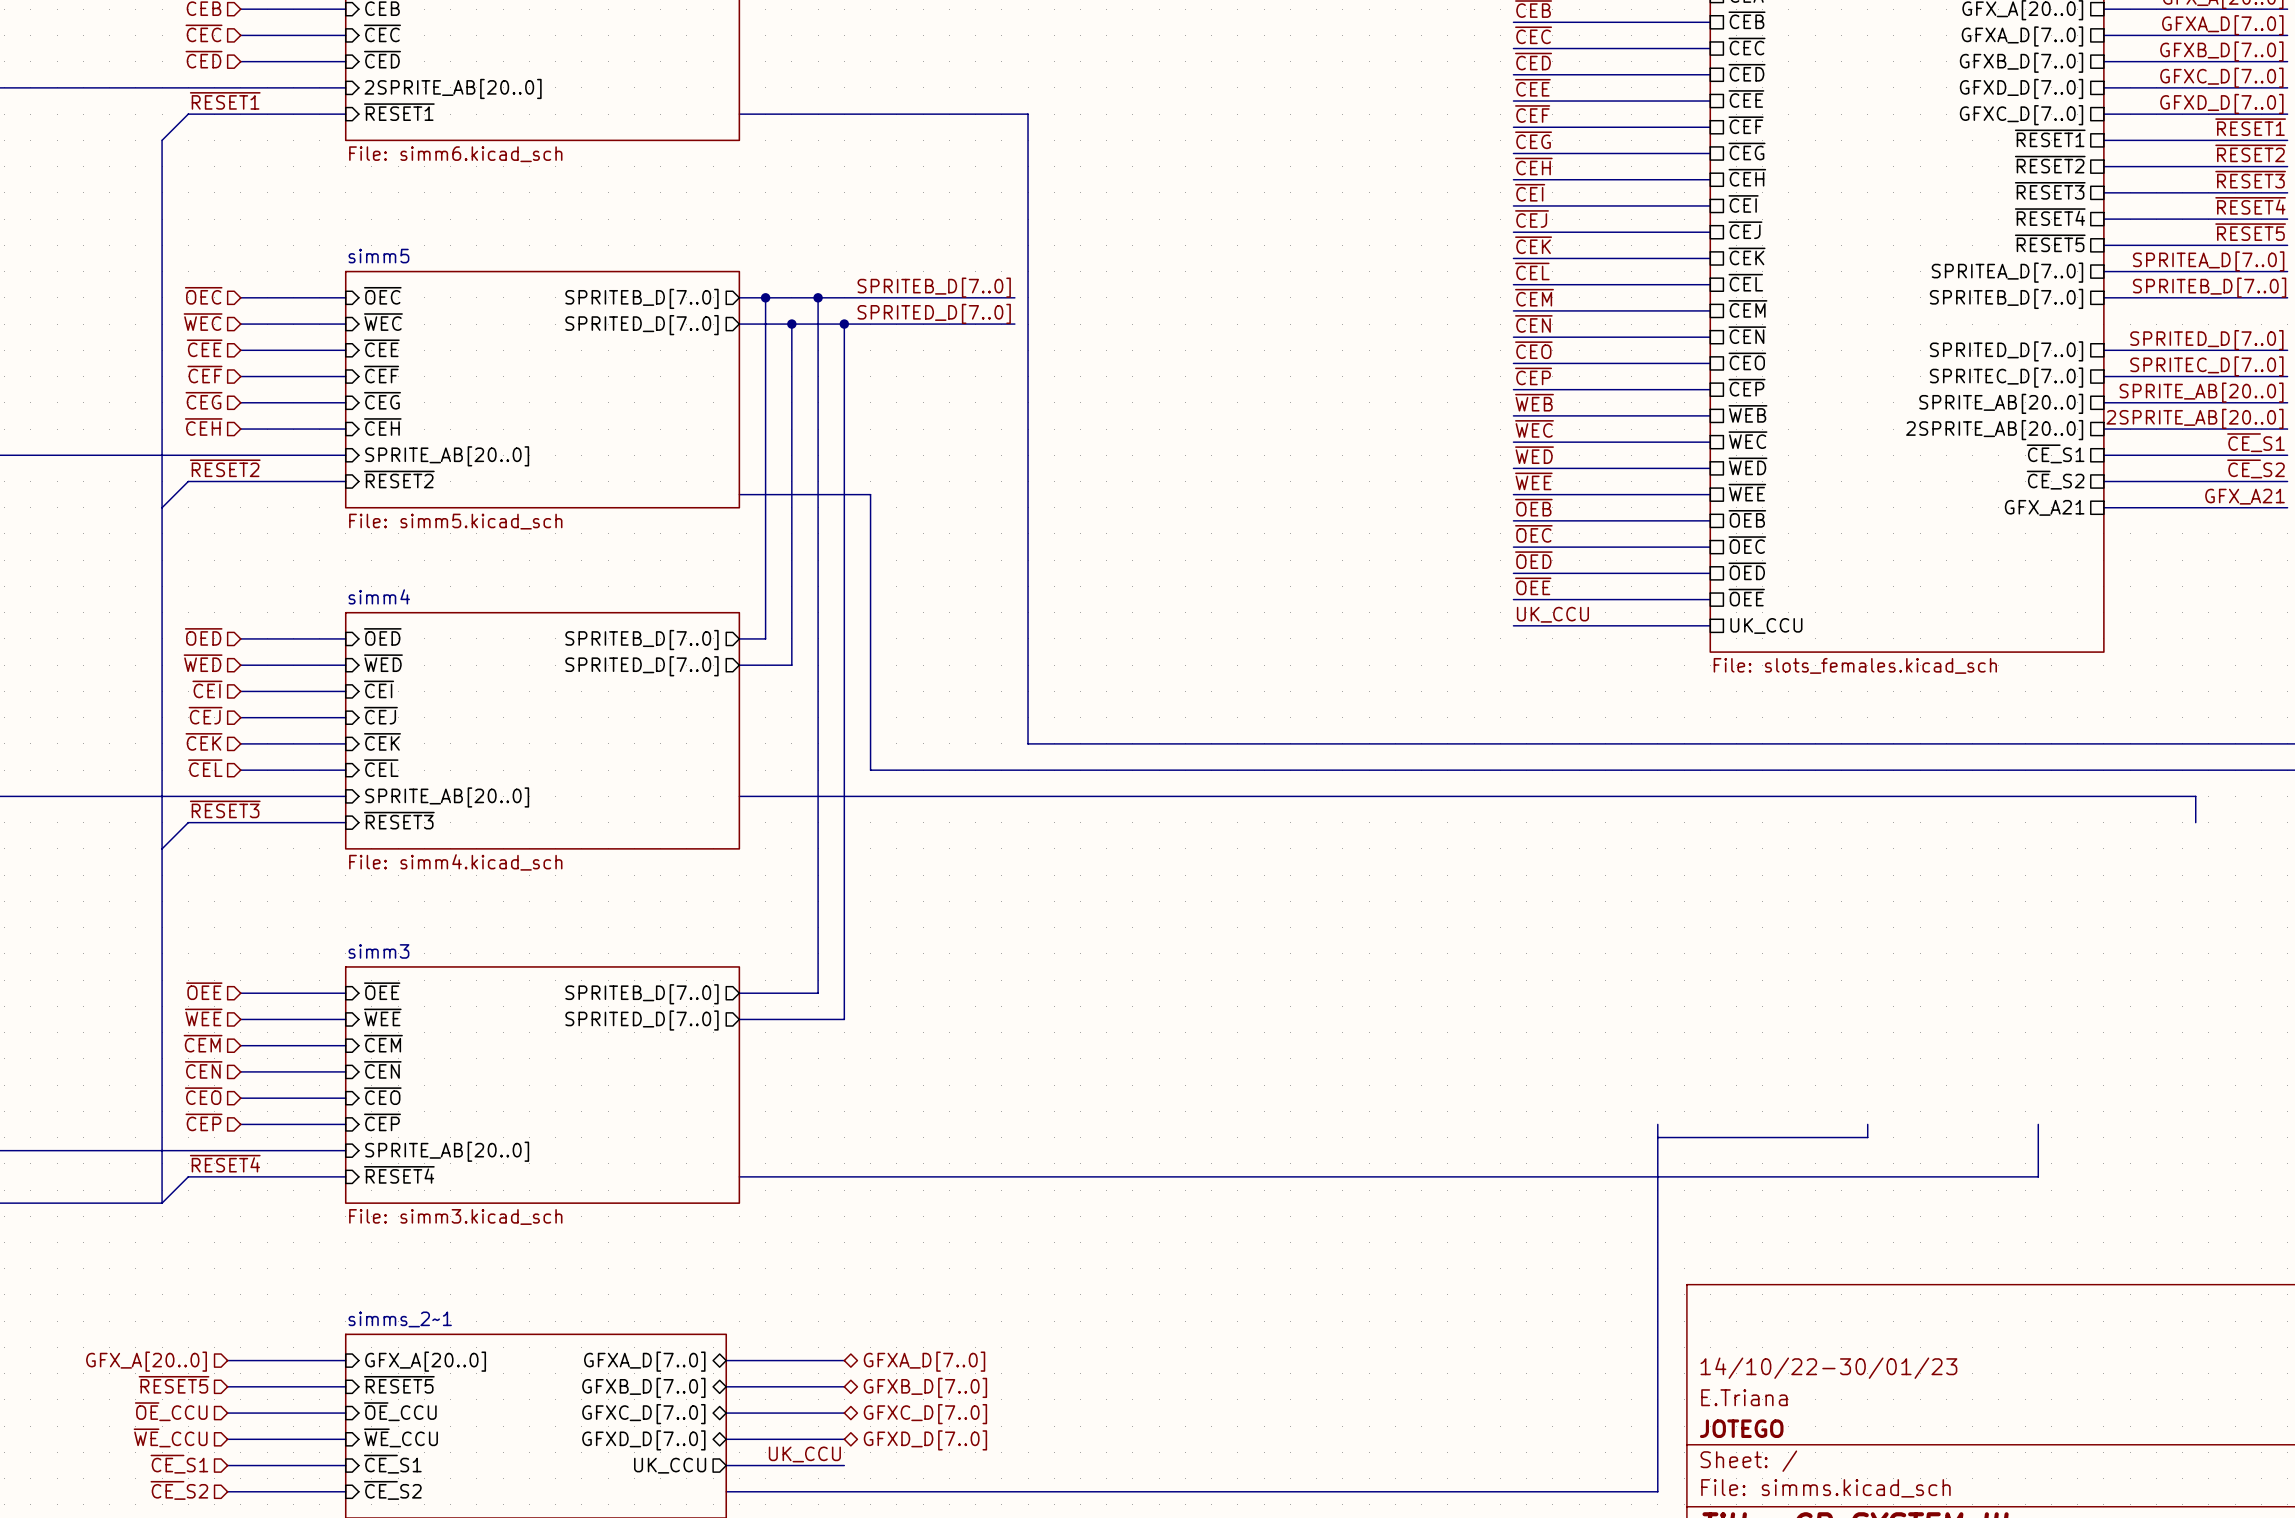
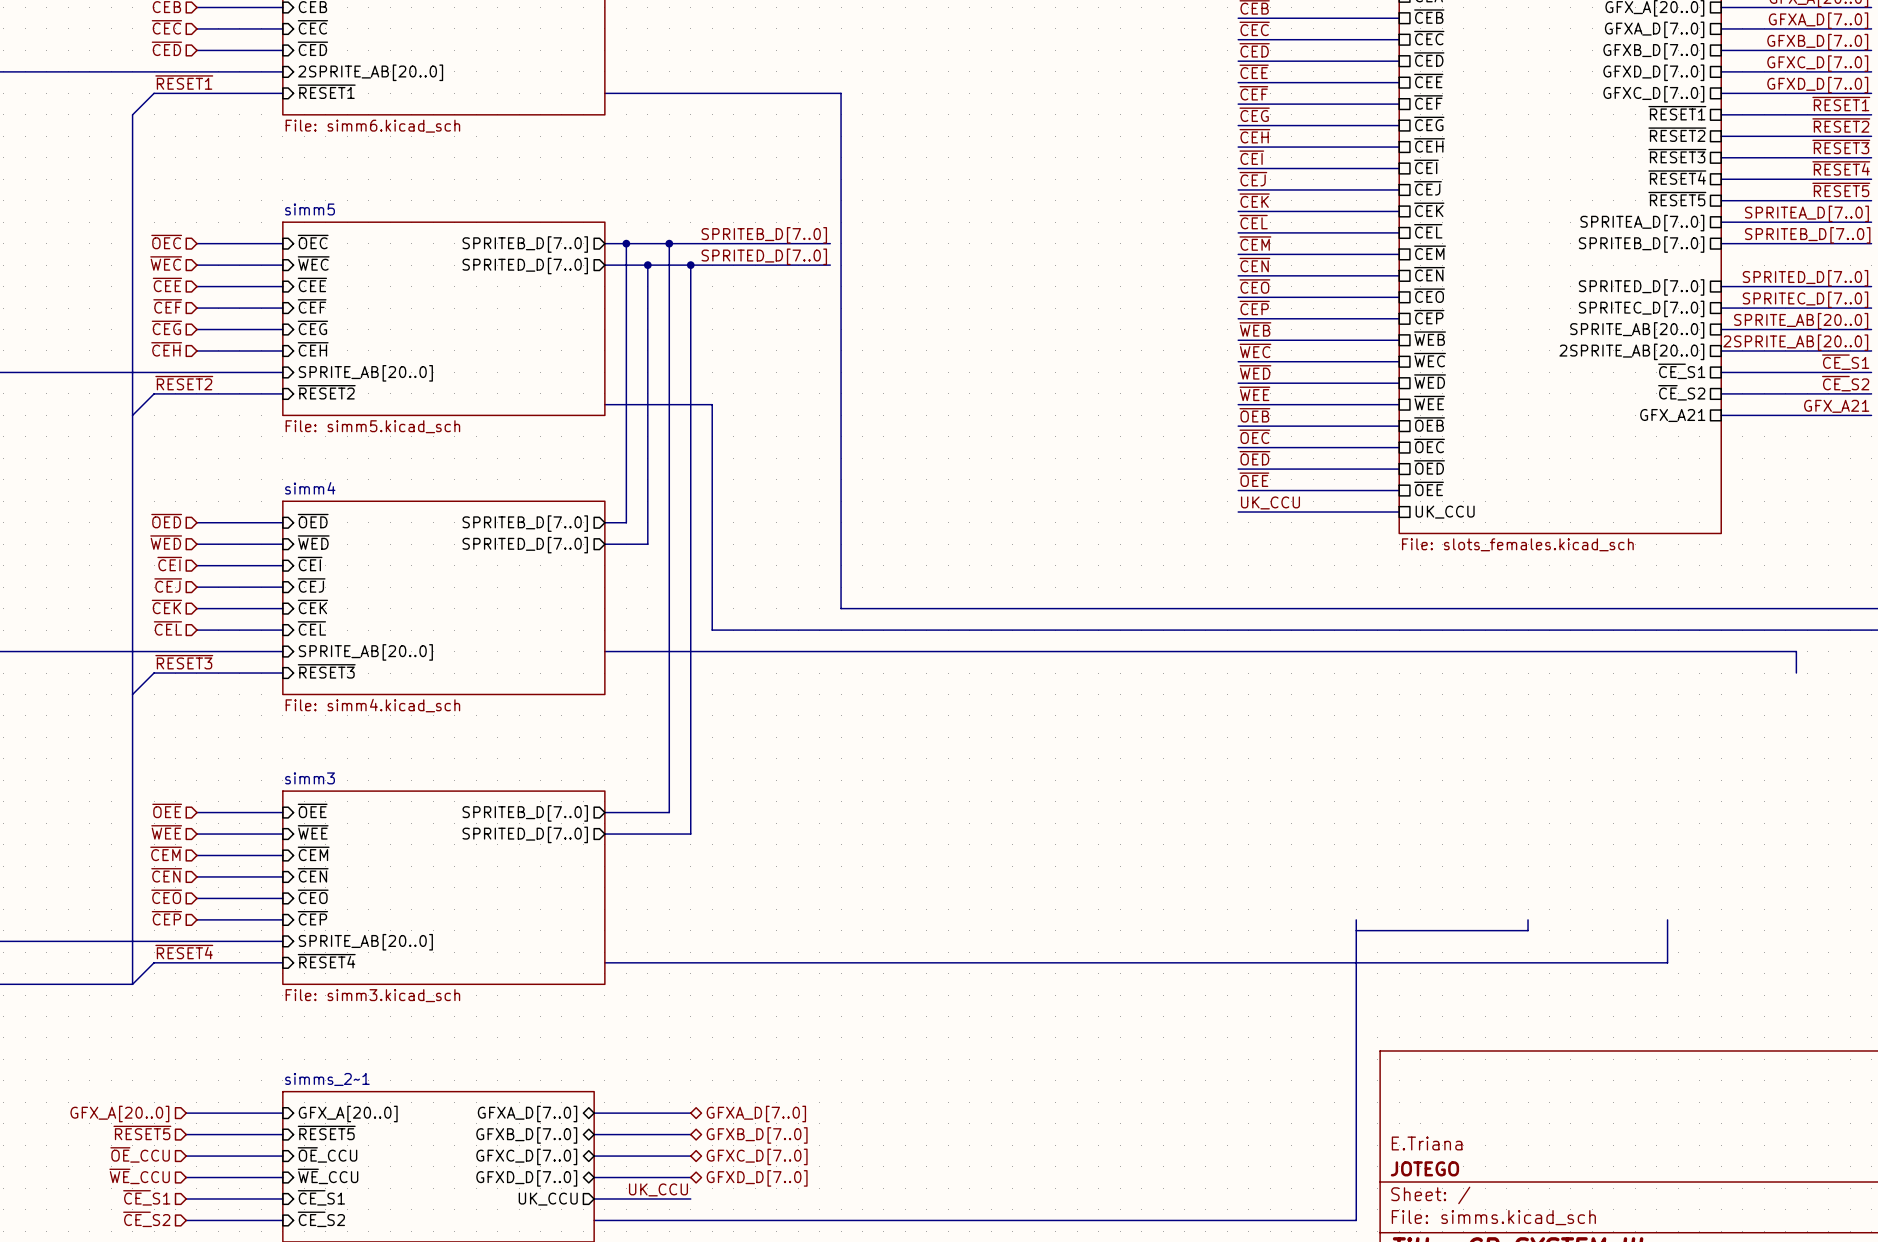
title block: 14/10/22-30/01/23 (1828, 1368) -> none

